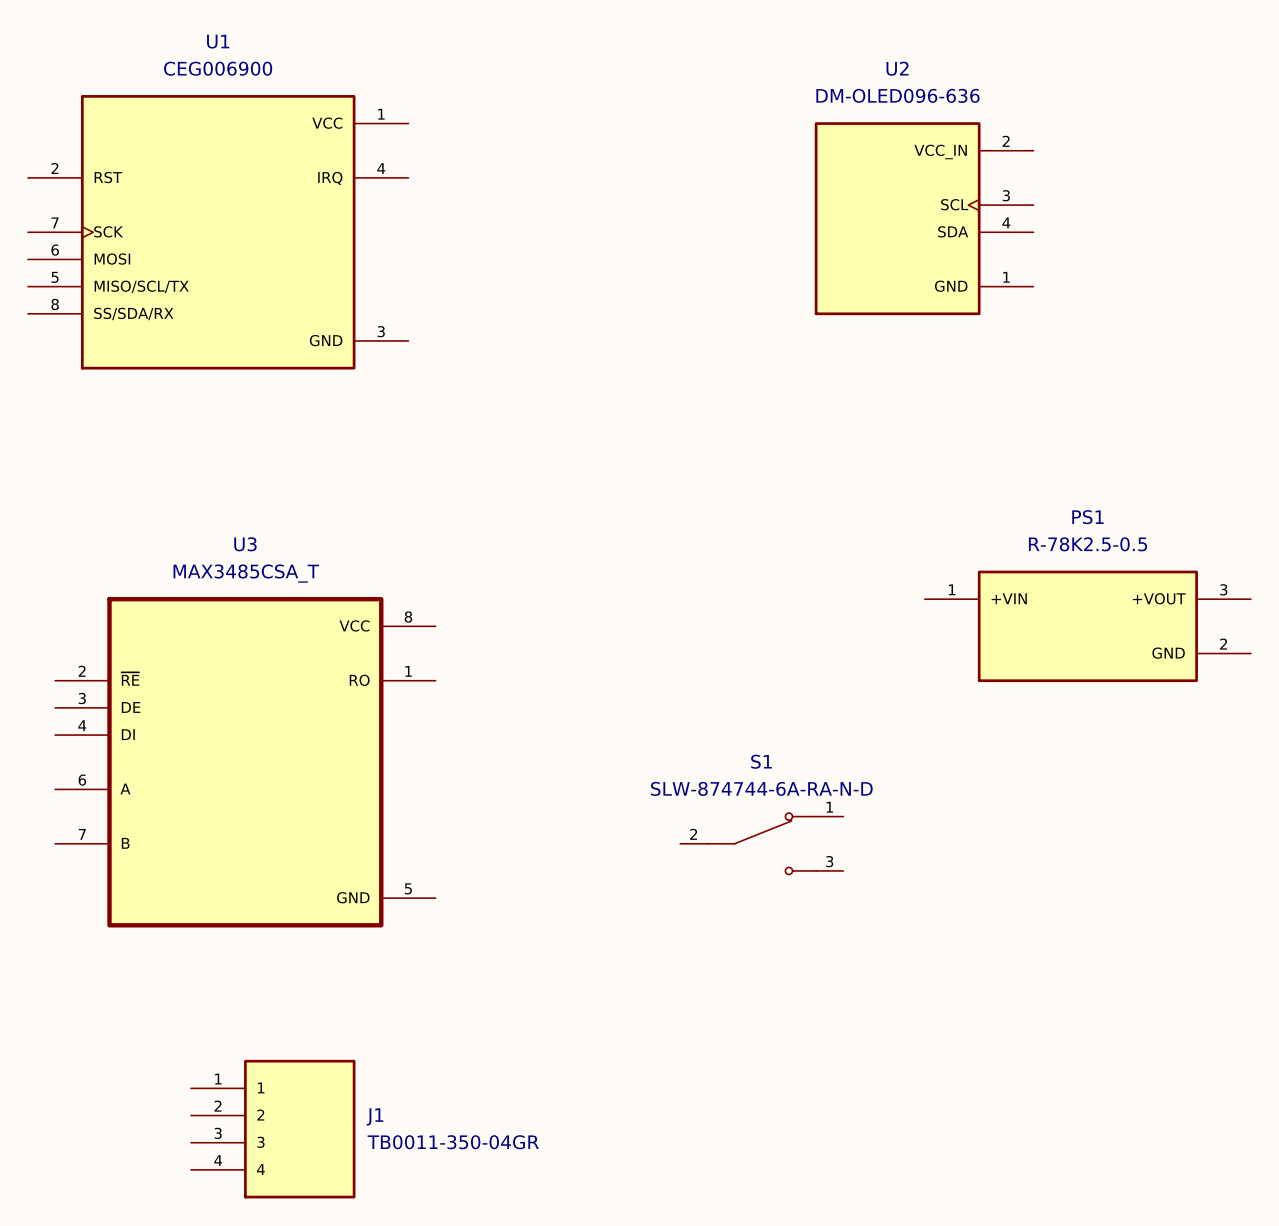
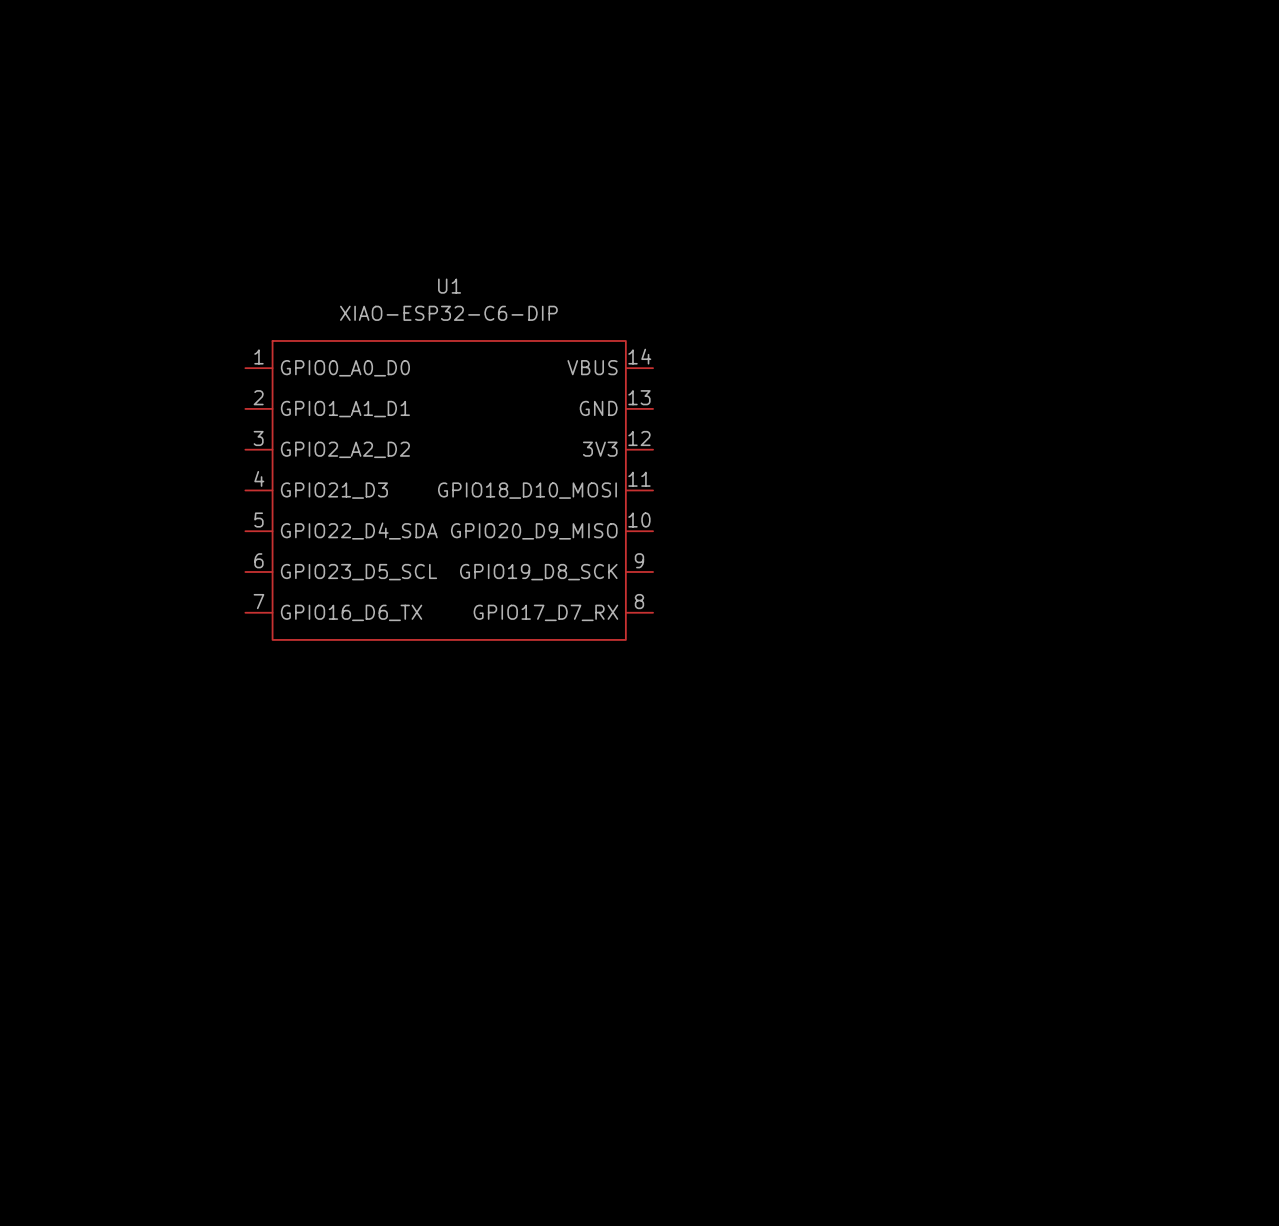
U1 value: CEG006900 (218, 68) -> XIAO-ESP32-C6-DIP (448, 313)
U1 symbol: [27, 95, 409, 370] -> [245, 340, 654, 640]
U2: DM-OLED096-636 (924, 218) -> none
PS1: R-78K2.5-0.5 (1087, 626) -> none
U3: MAX3485CSA_T (245, 762) -> none
S1: SLW-874744-6A-RA-N-D (761, 843) -> none
J1: TB0011-350-04GR (273, 1129) -> none

